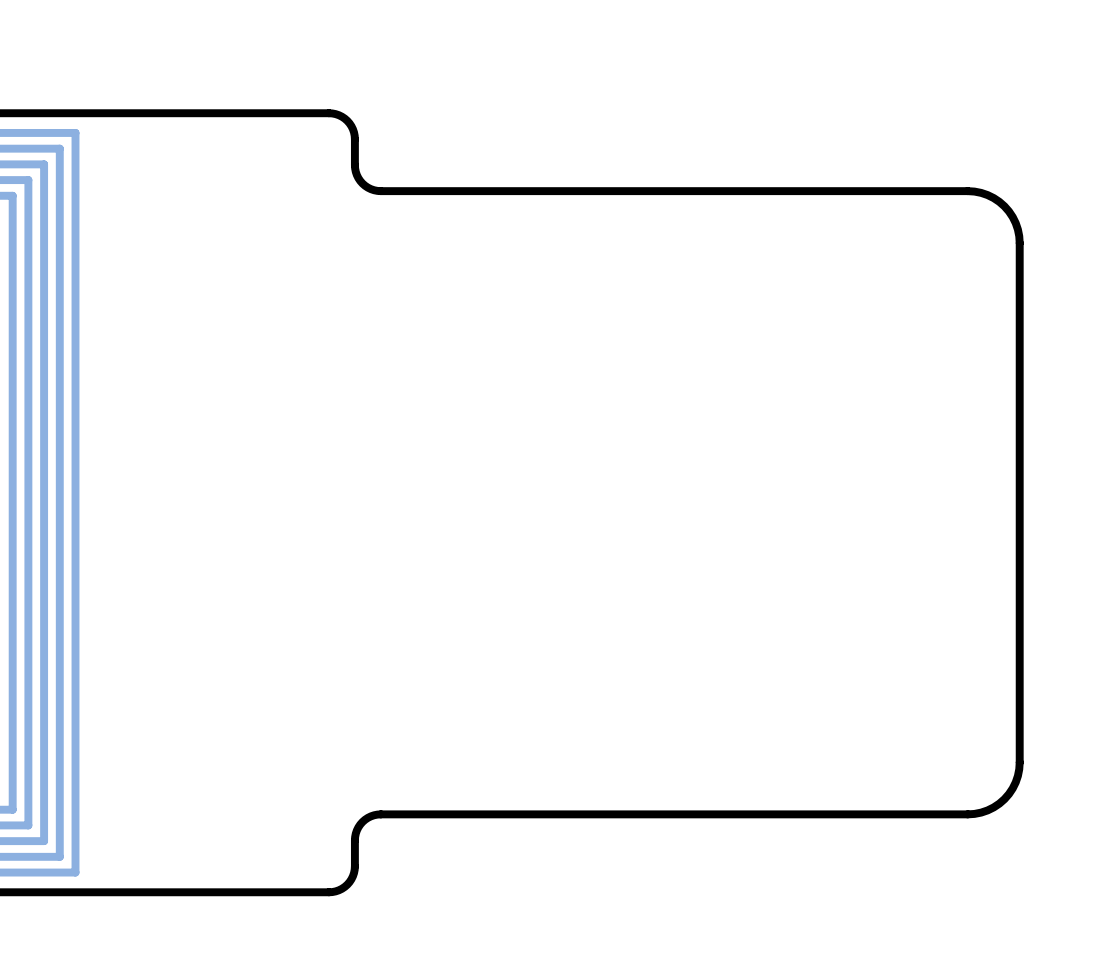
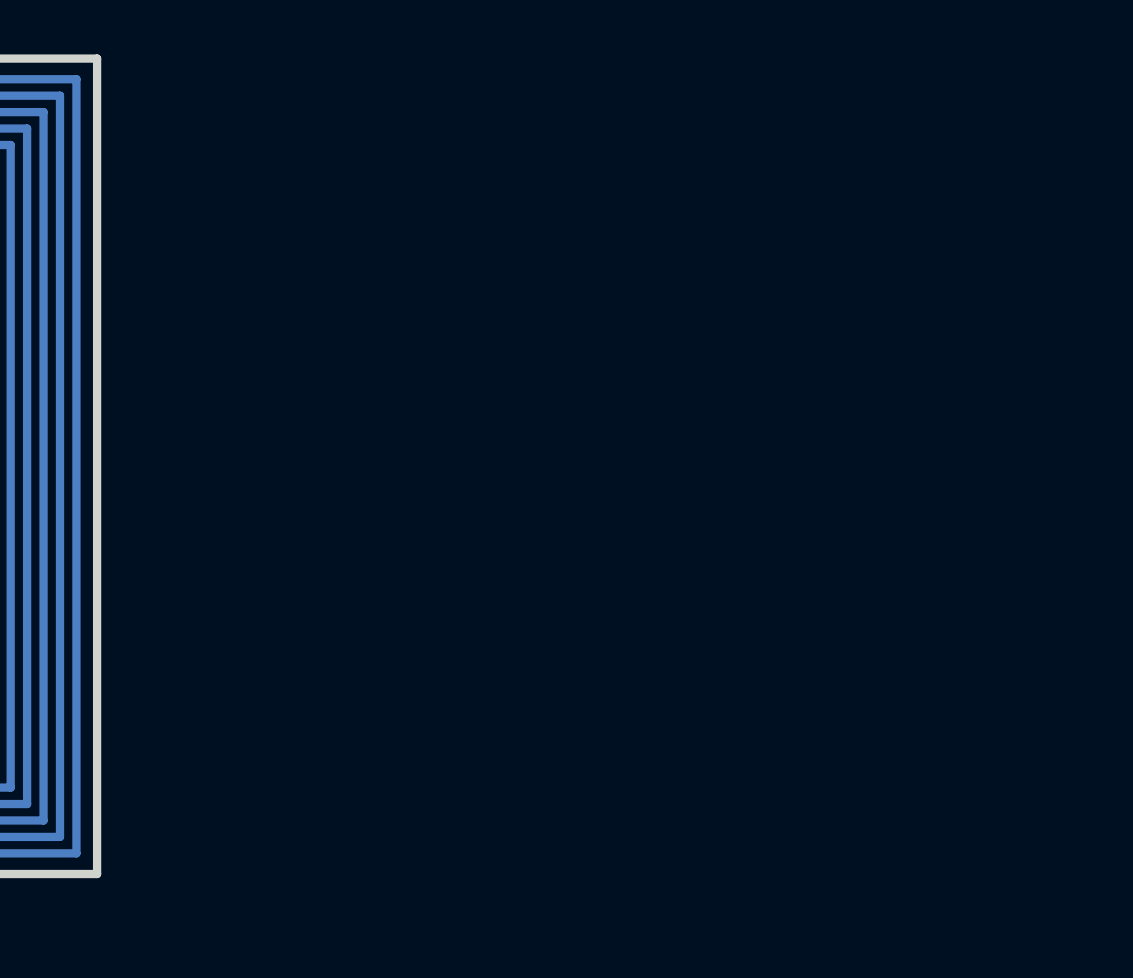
board edge: (95, 113) (335, 114) (347, 120) (352, 129) (355, 168) (358, 178) (365, 185) (377, 190) (974, 191) (993, 198) (1004, 206) (1015, 223) (1019, 243) (1019, 762) (1015, 782) (1008, 794) (999, 803) (981, 812) (967, 814) (377, 814) (365, 819) (358, 827) (355, 836) (352, 876) (347, 884) (335, 891) (95, 892) -> (97, 58) (97, 874)

